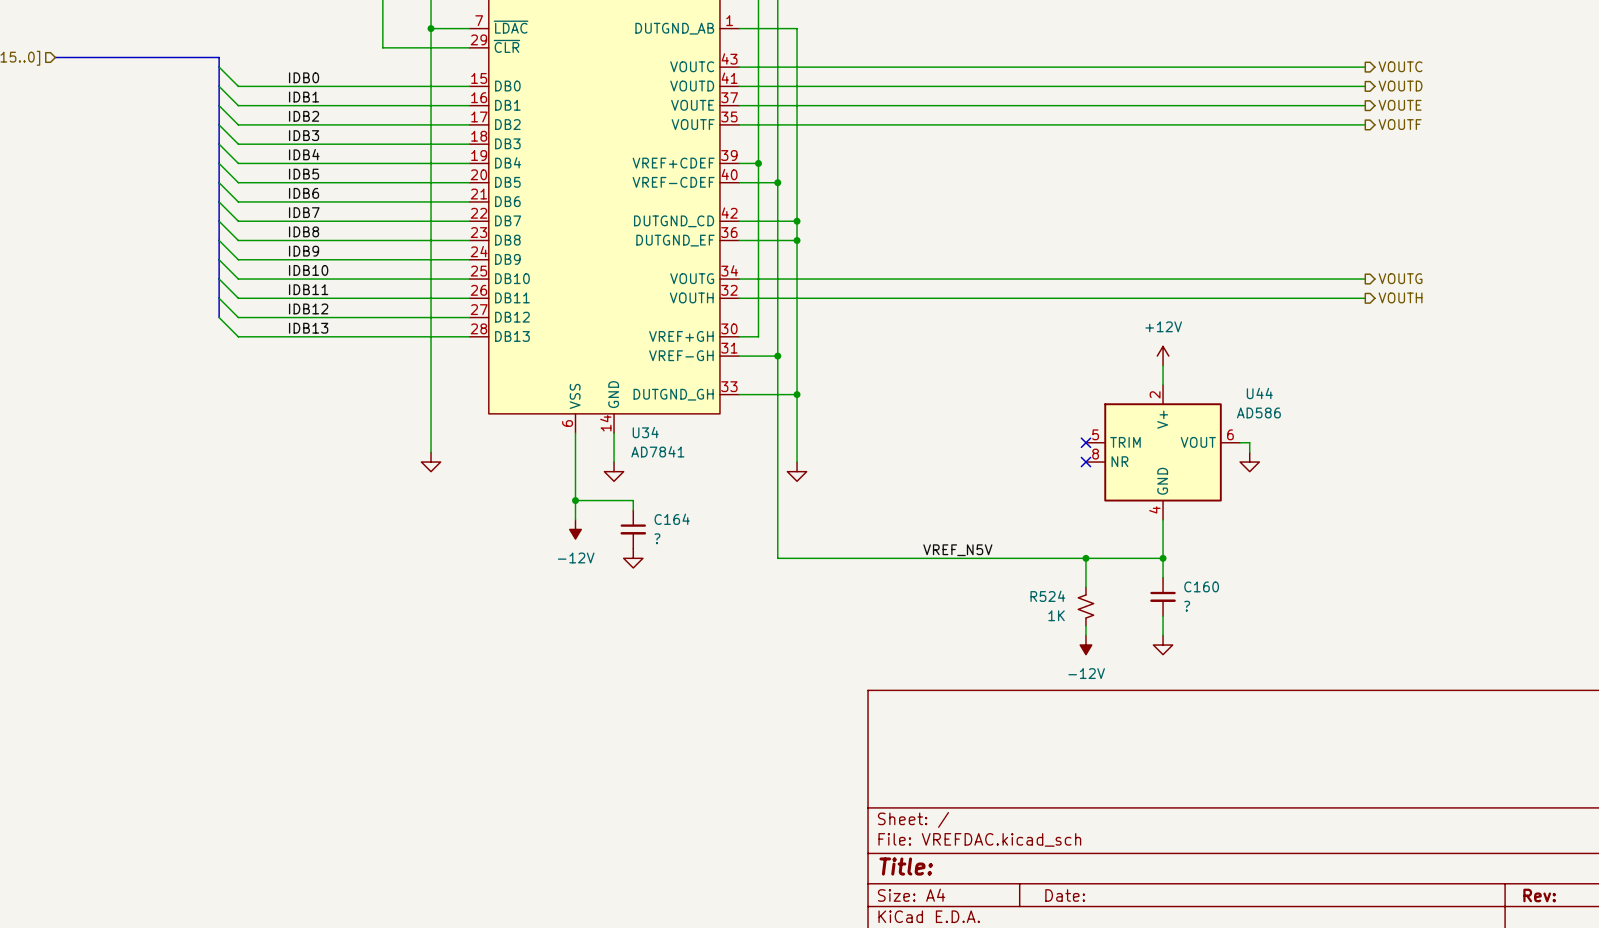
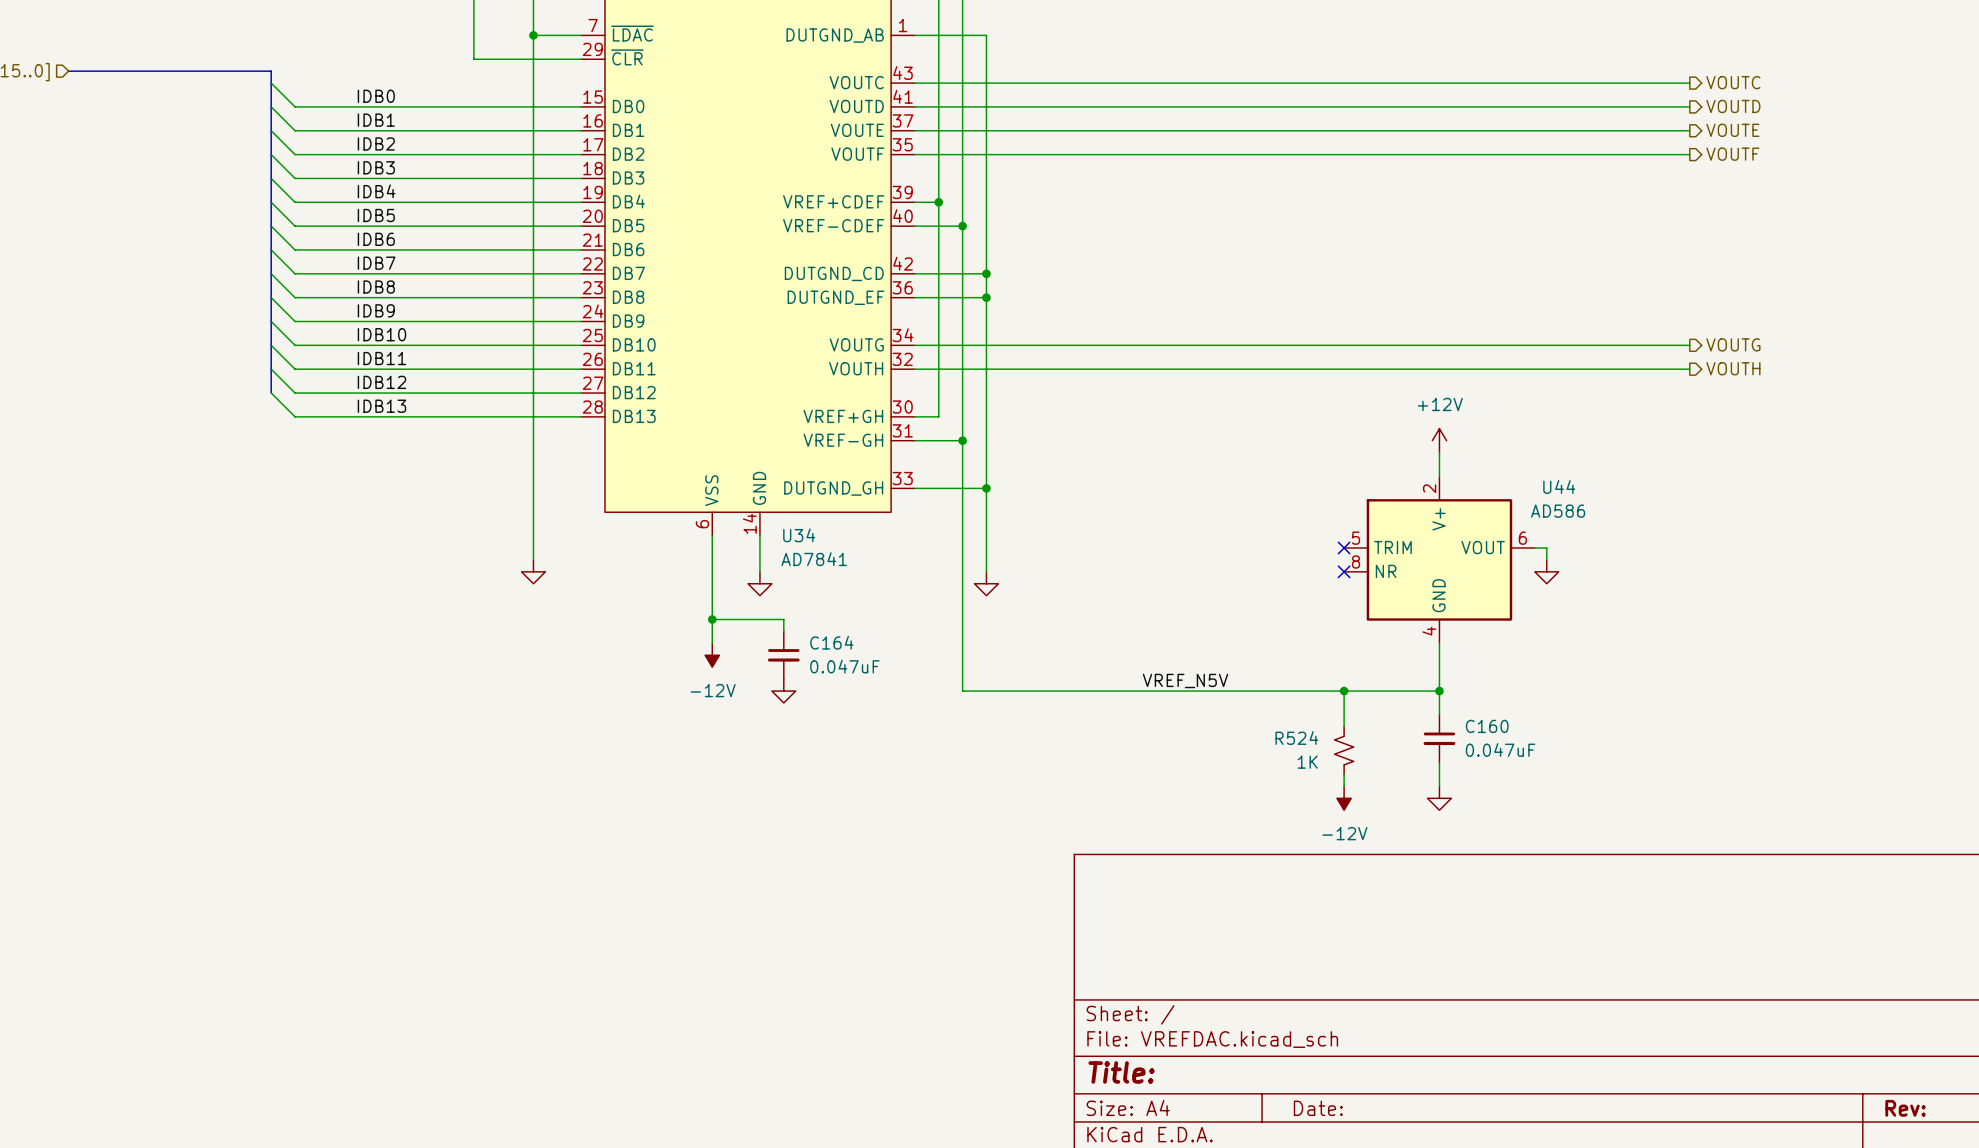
C164 value: ? (657, 538) -> 0.047uF (844, 666)
C160 value: ? (1187, 606) -> 0.047uF (1500, 749)

